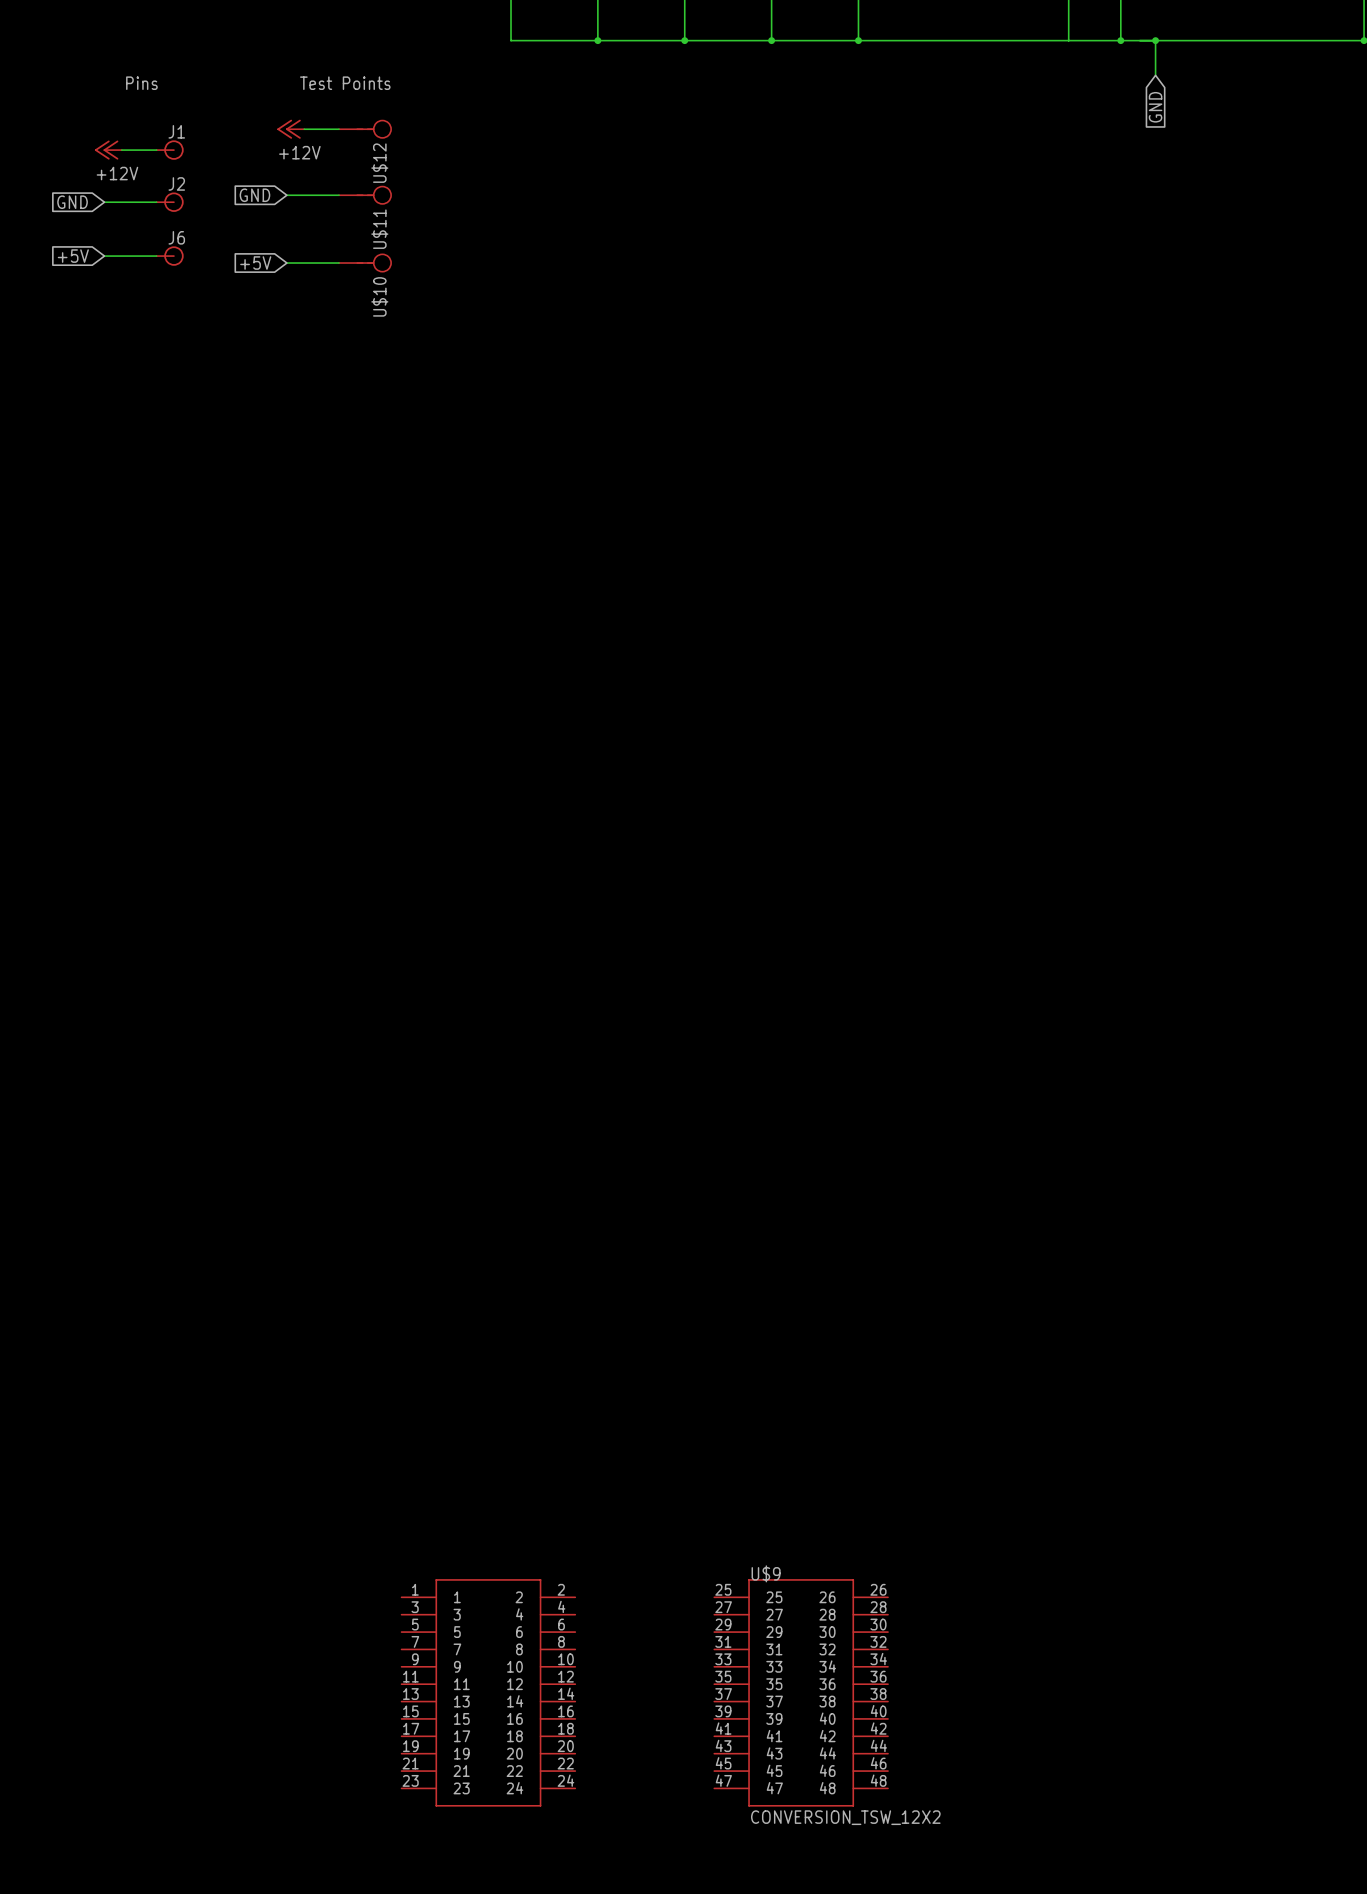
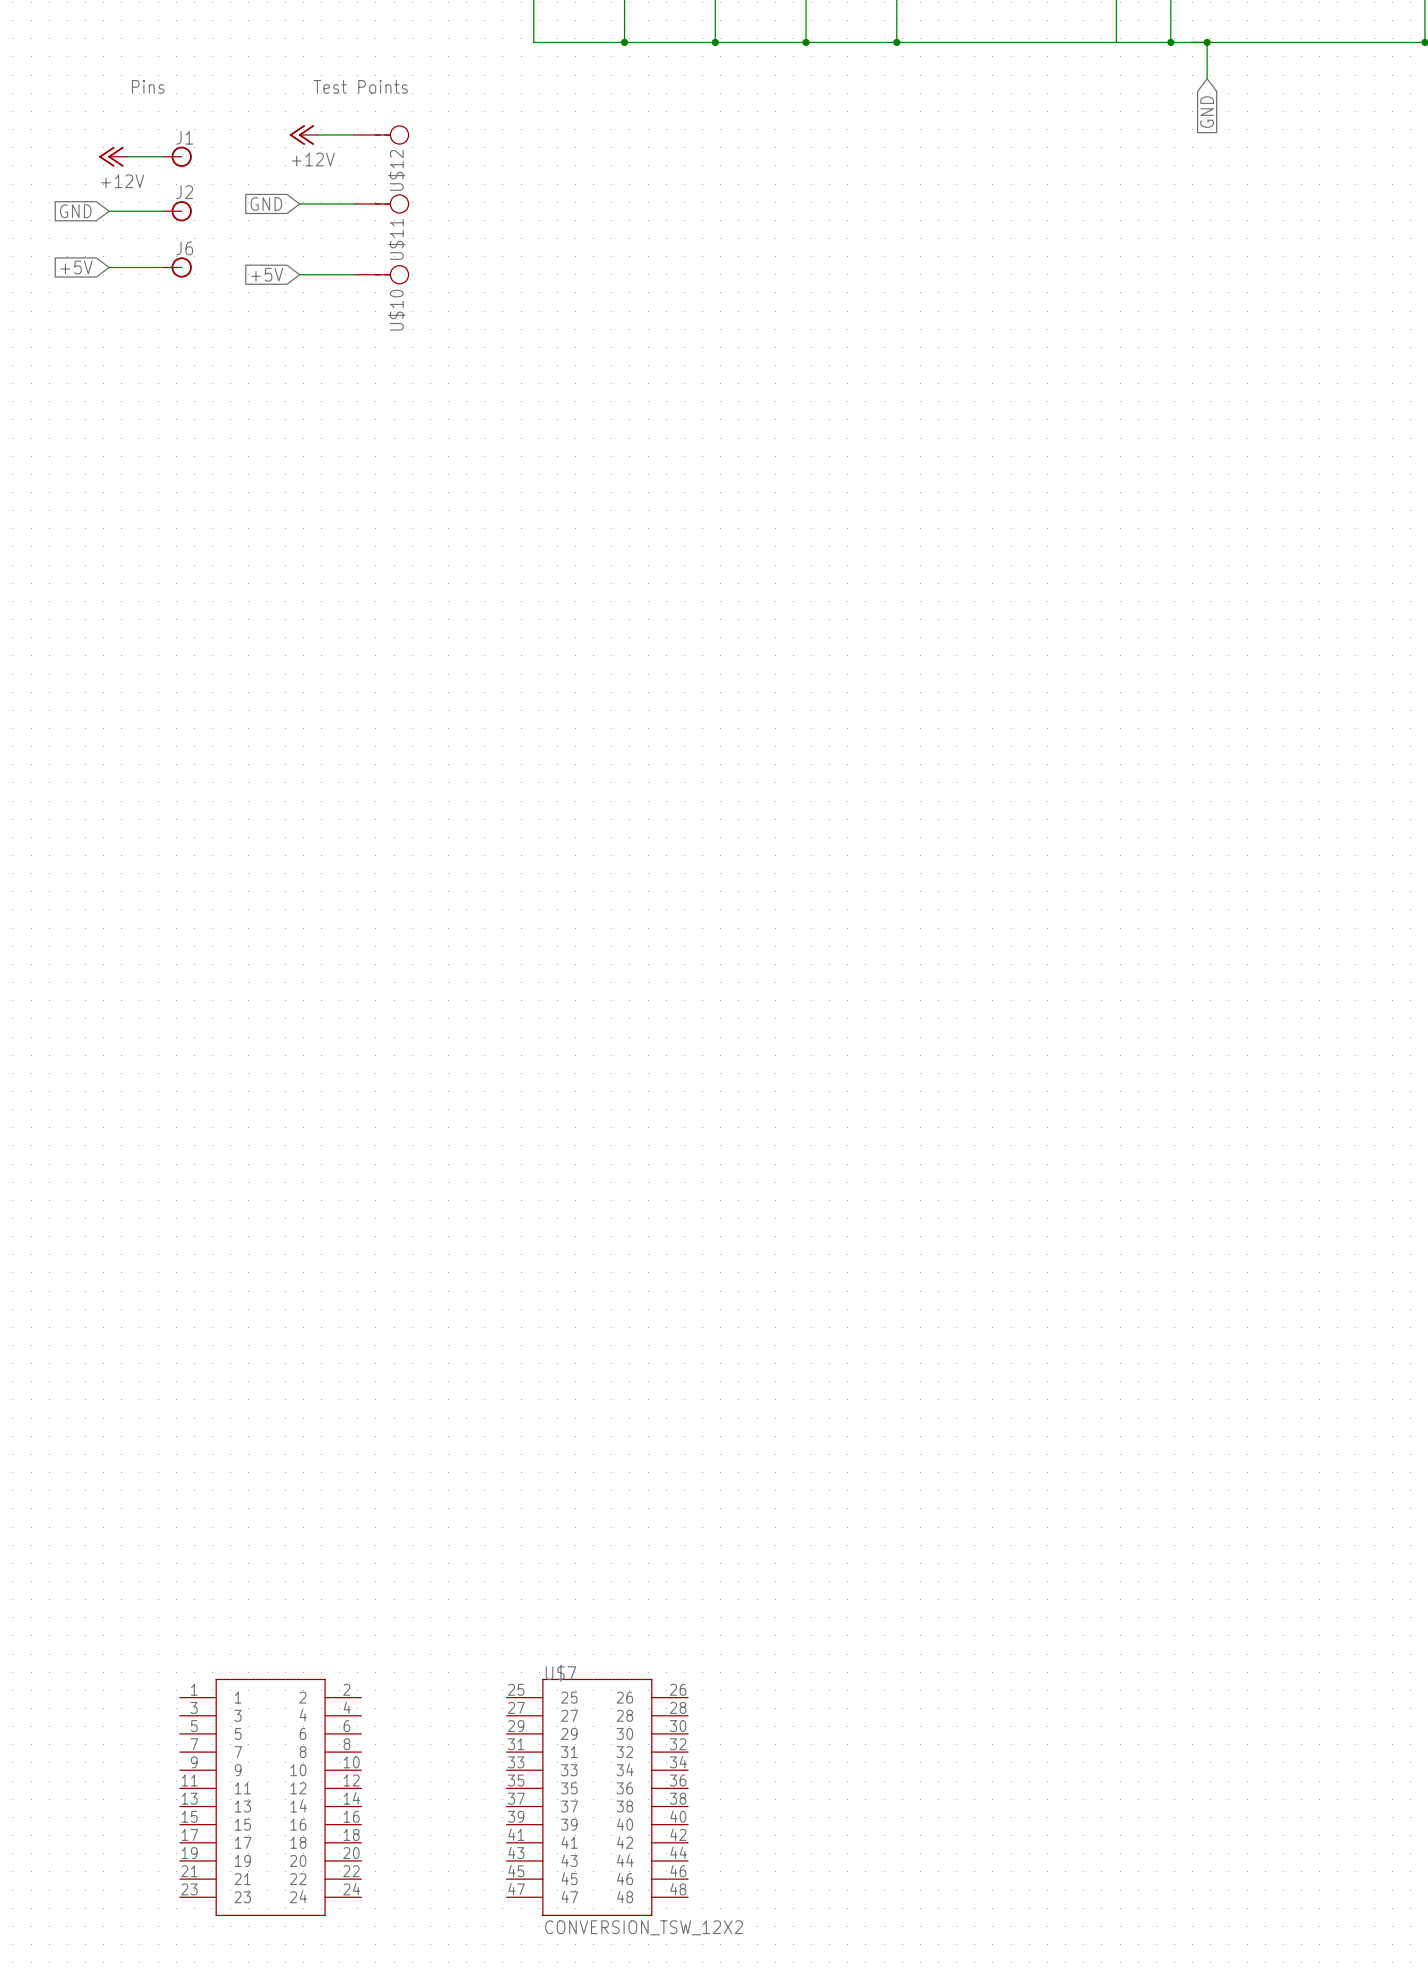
U$9: CONVERSION_TSW_12X2 (644, 1692) -> none
U$7: none -> CONVERSION_TSW_12X2 (433, 1797)

